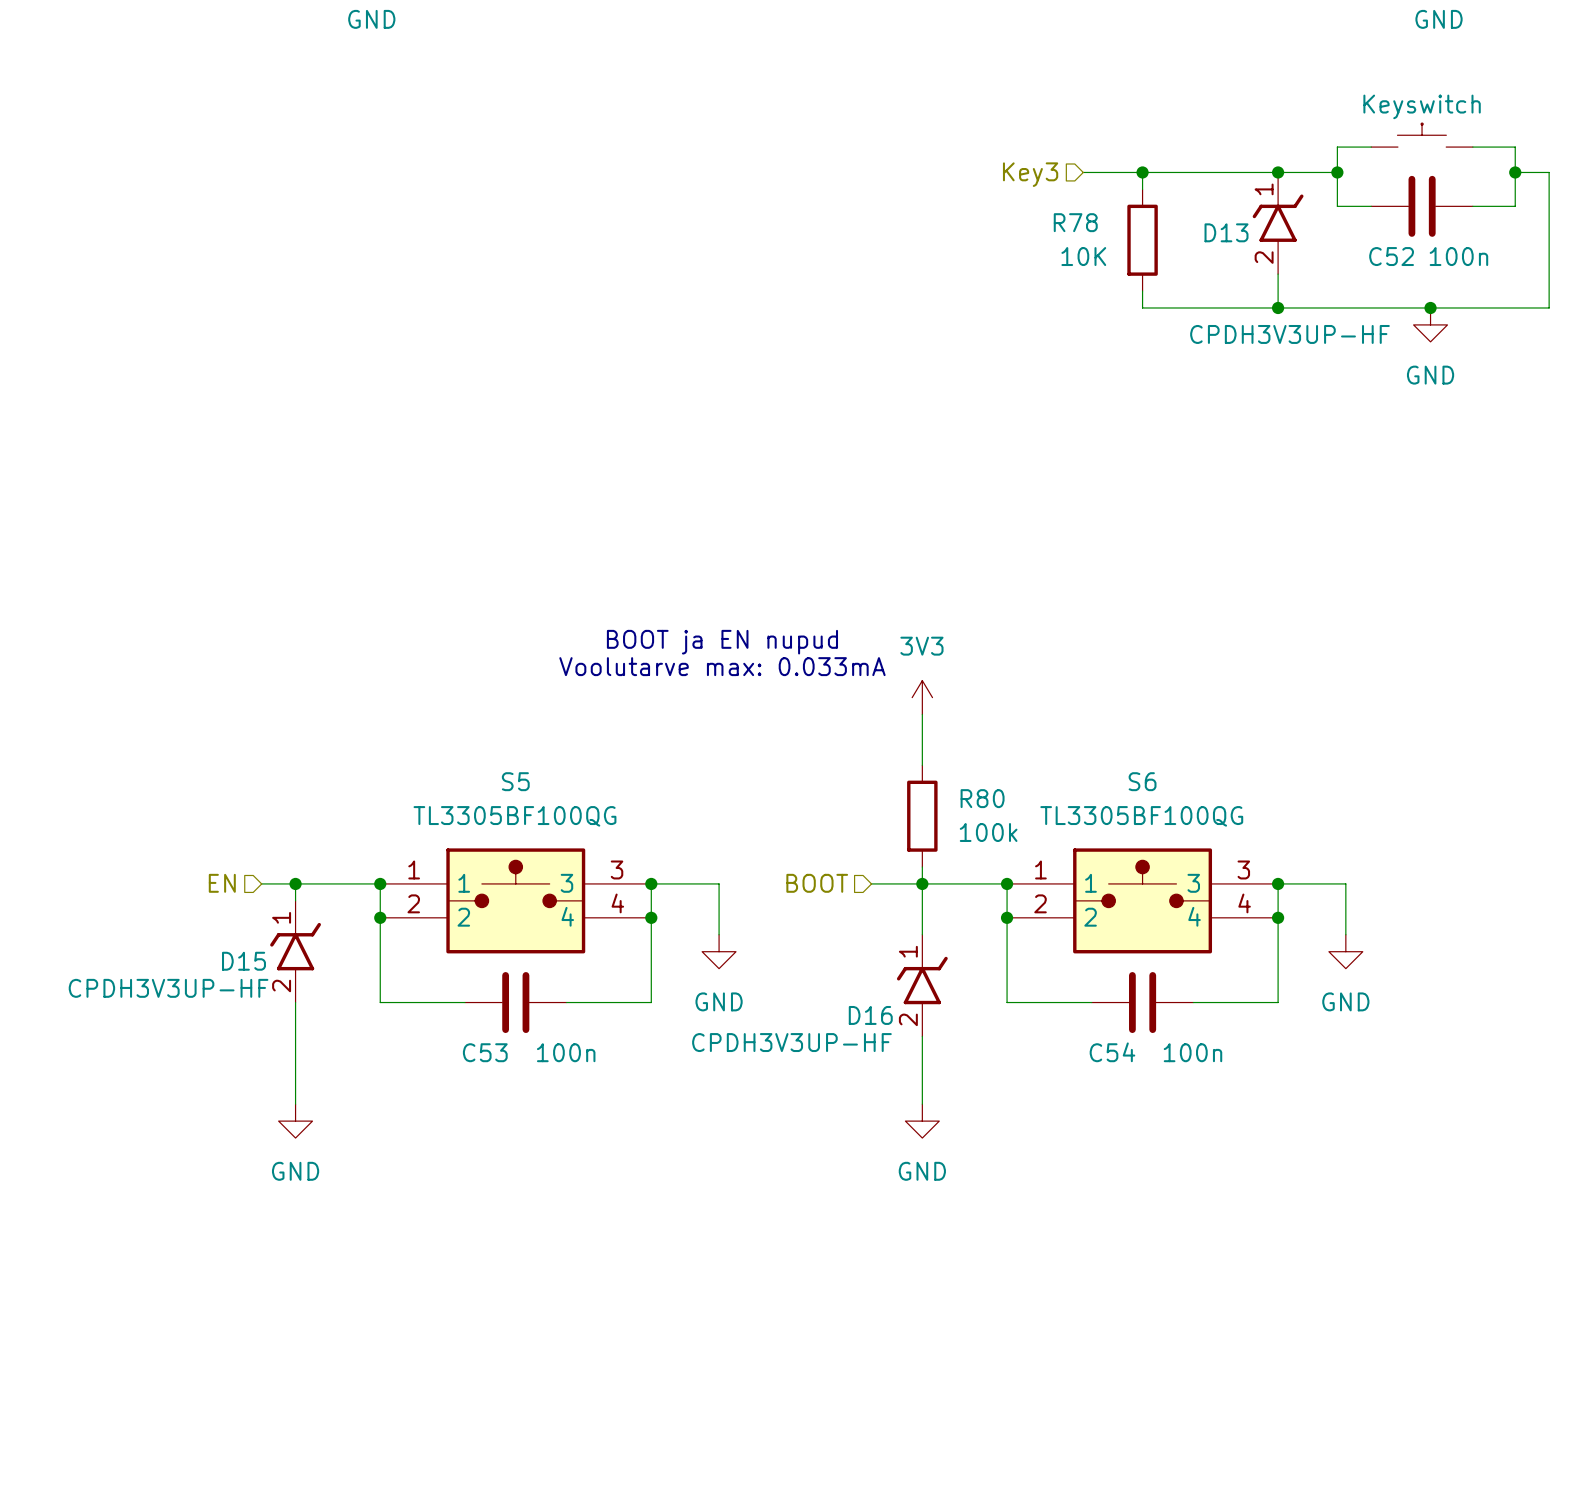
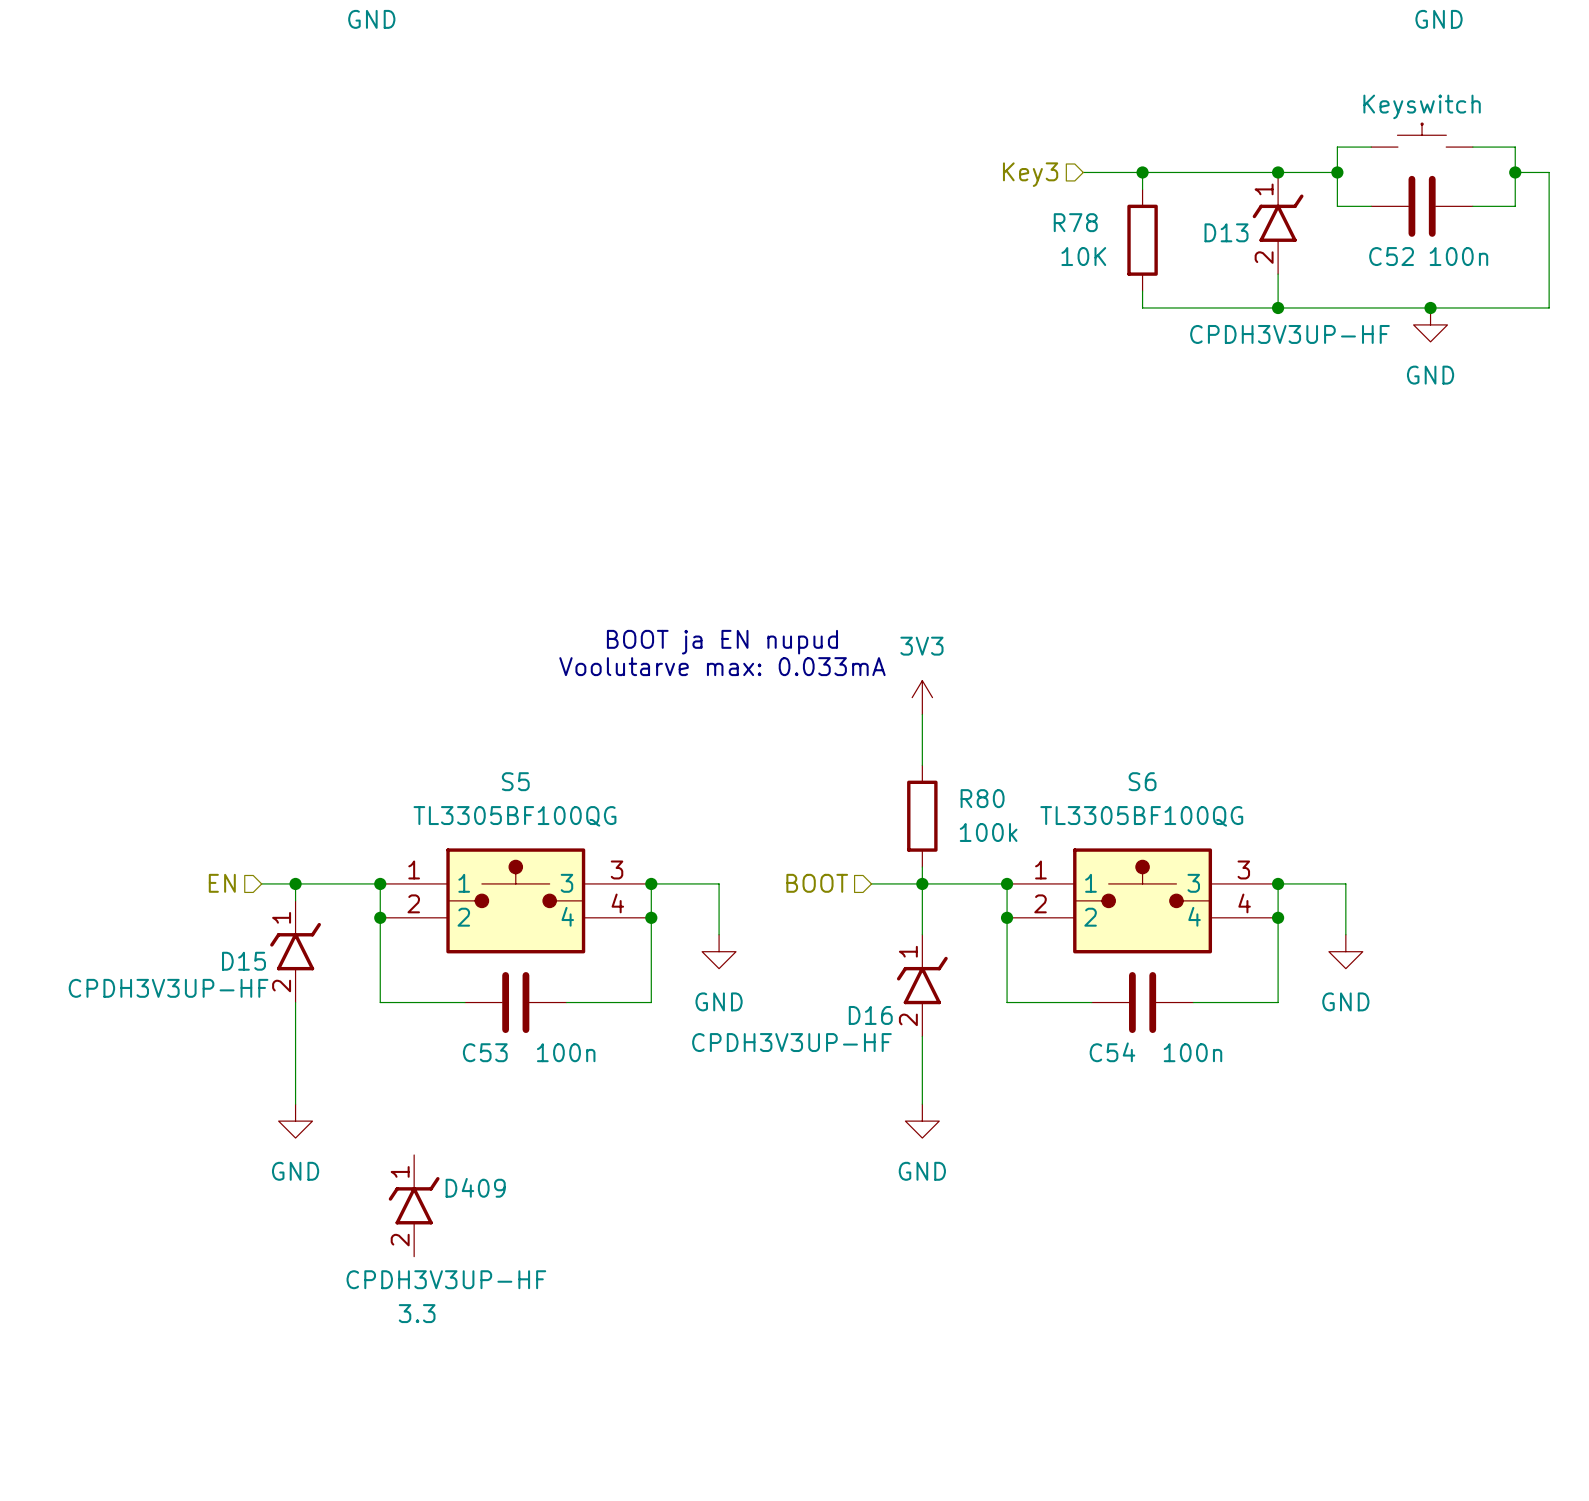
D409: none -> CPDH3V3UP-HF (414, 1205)

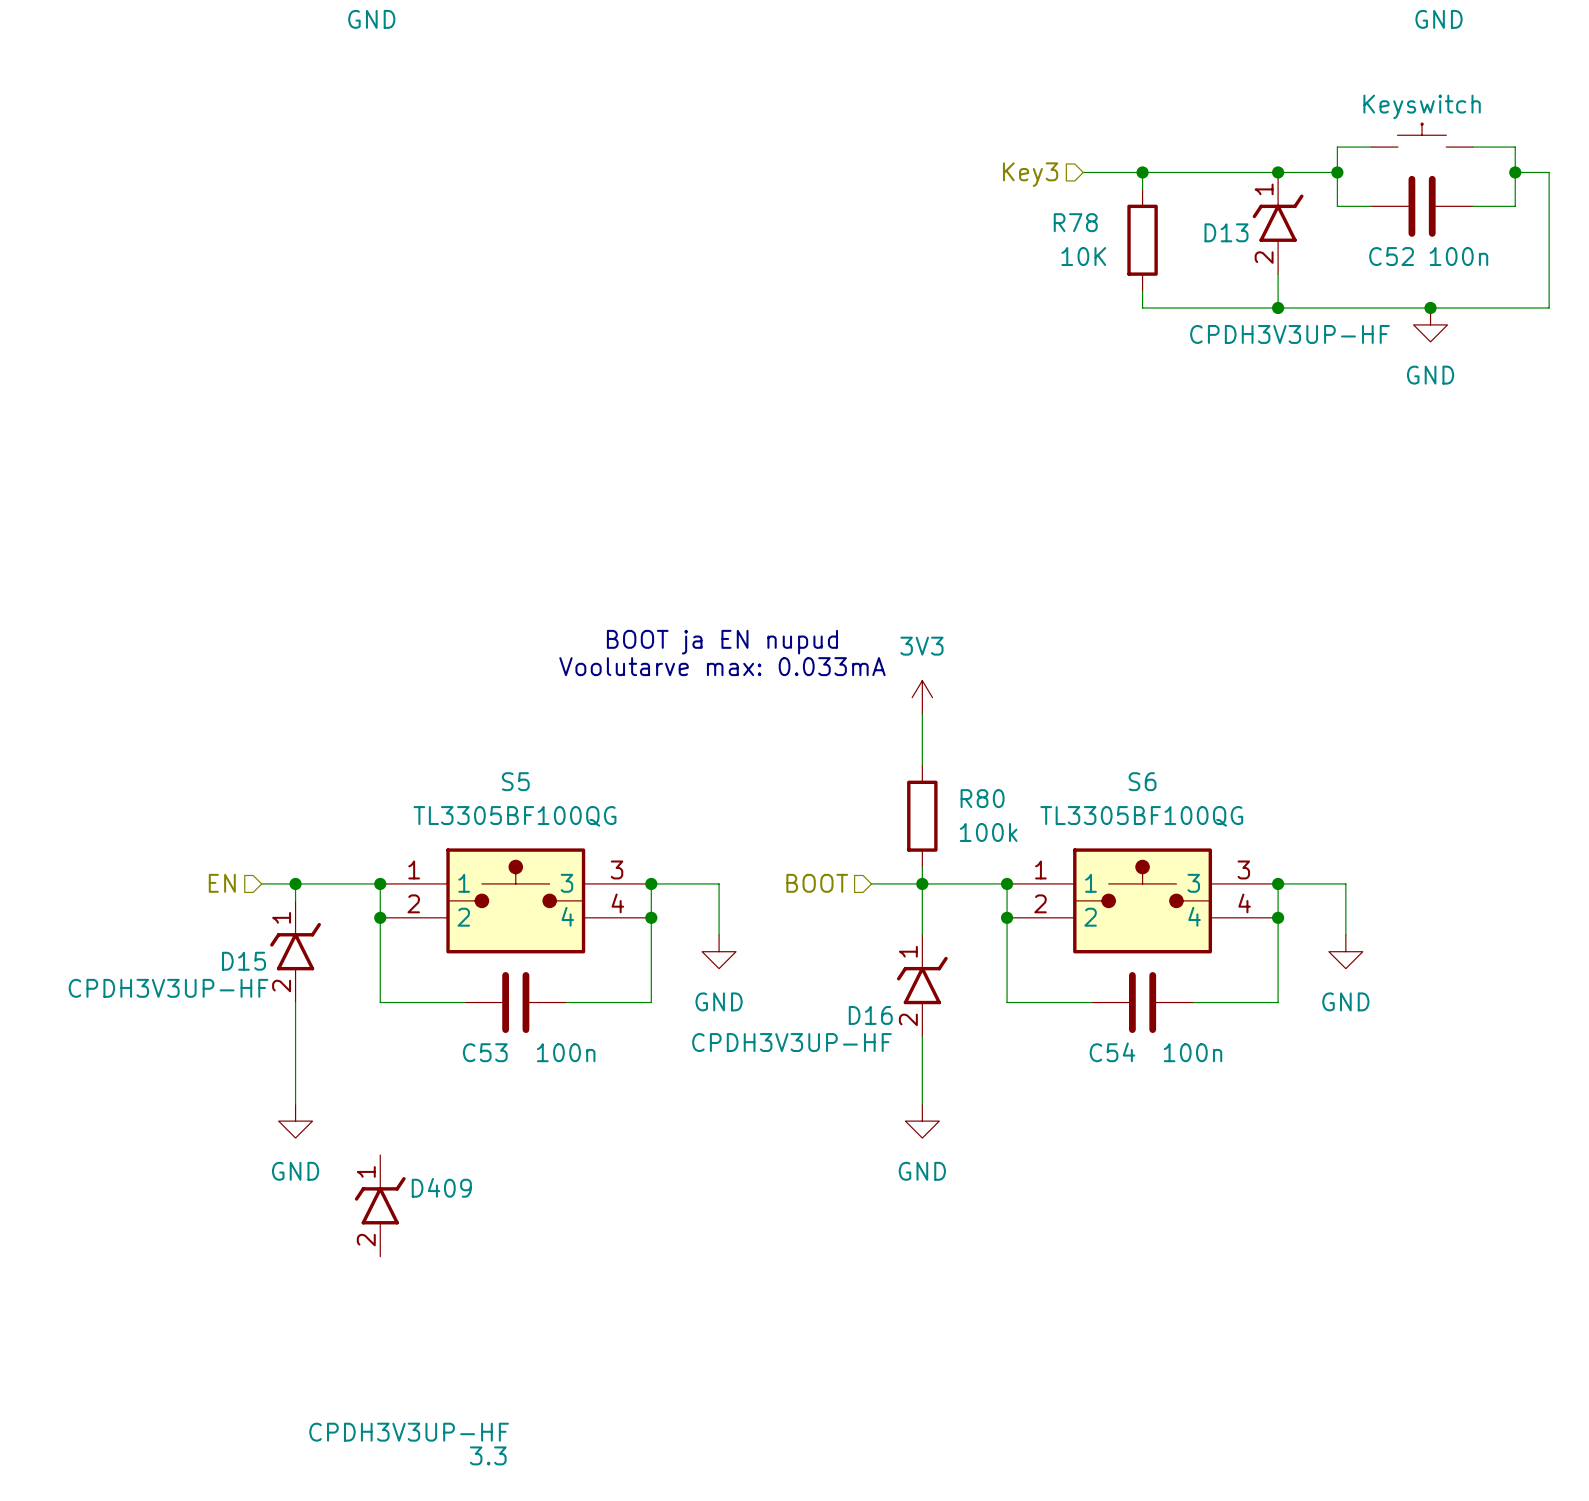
D409 position: (414, 1205) -> (380, 1205)
D409 value position: CPDH3V3UP-HF (446, 1279) -> CPDH3V3UP-HF (409, 1432)
D409 text position: 3.3 (417, 1313) -> 3.3 (488, 1455)

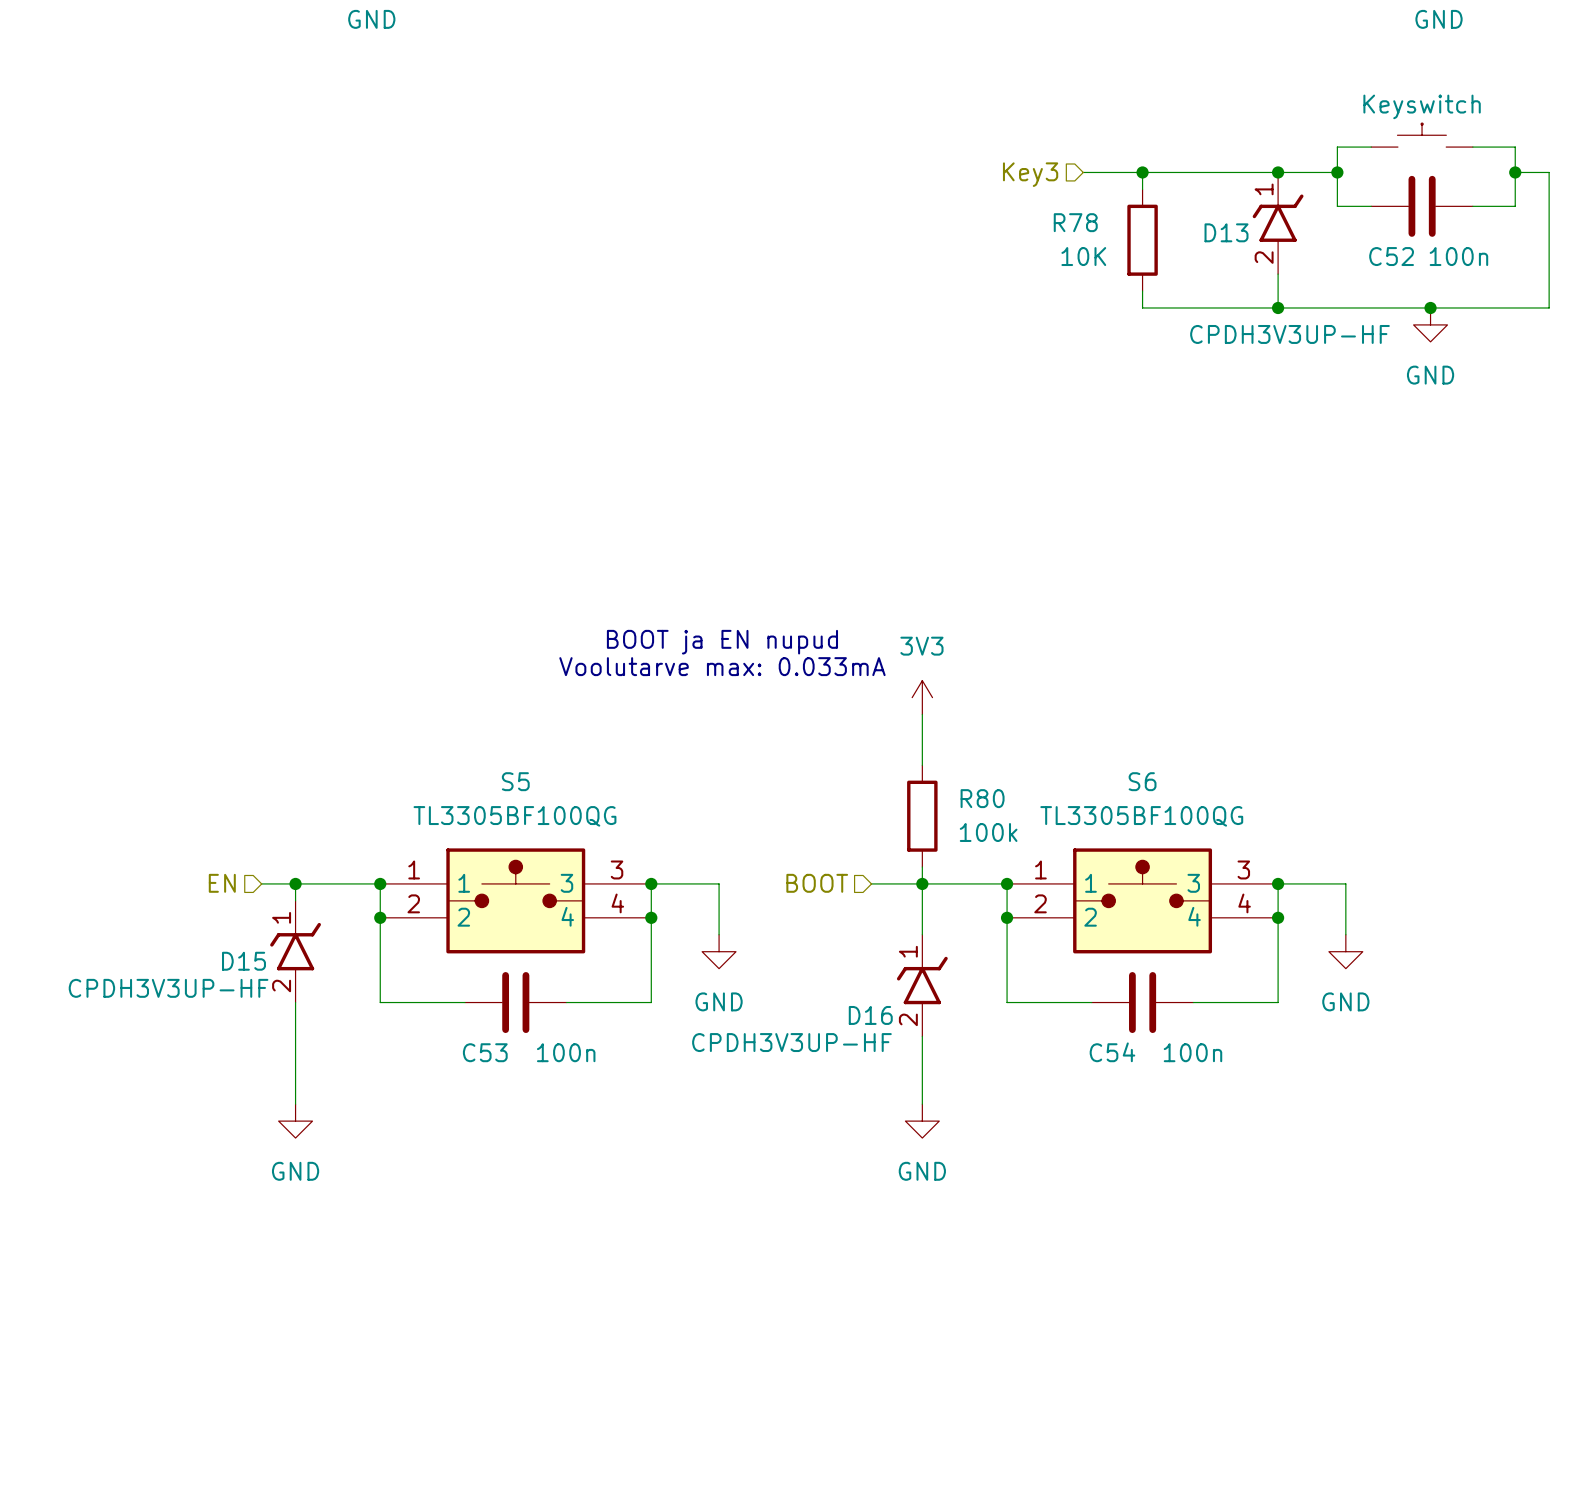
D409: CPDH3V3UP-HF (380, 1205) -> none

